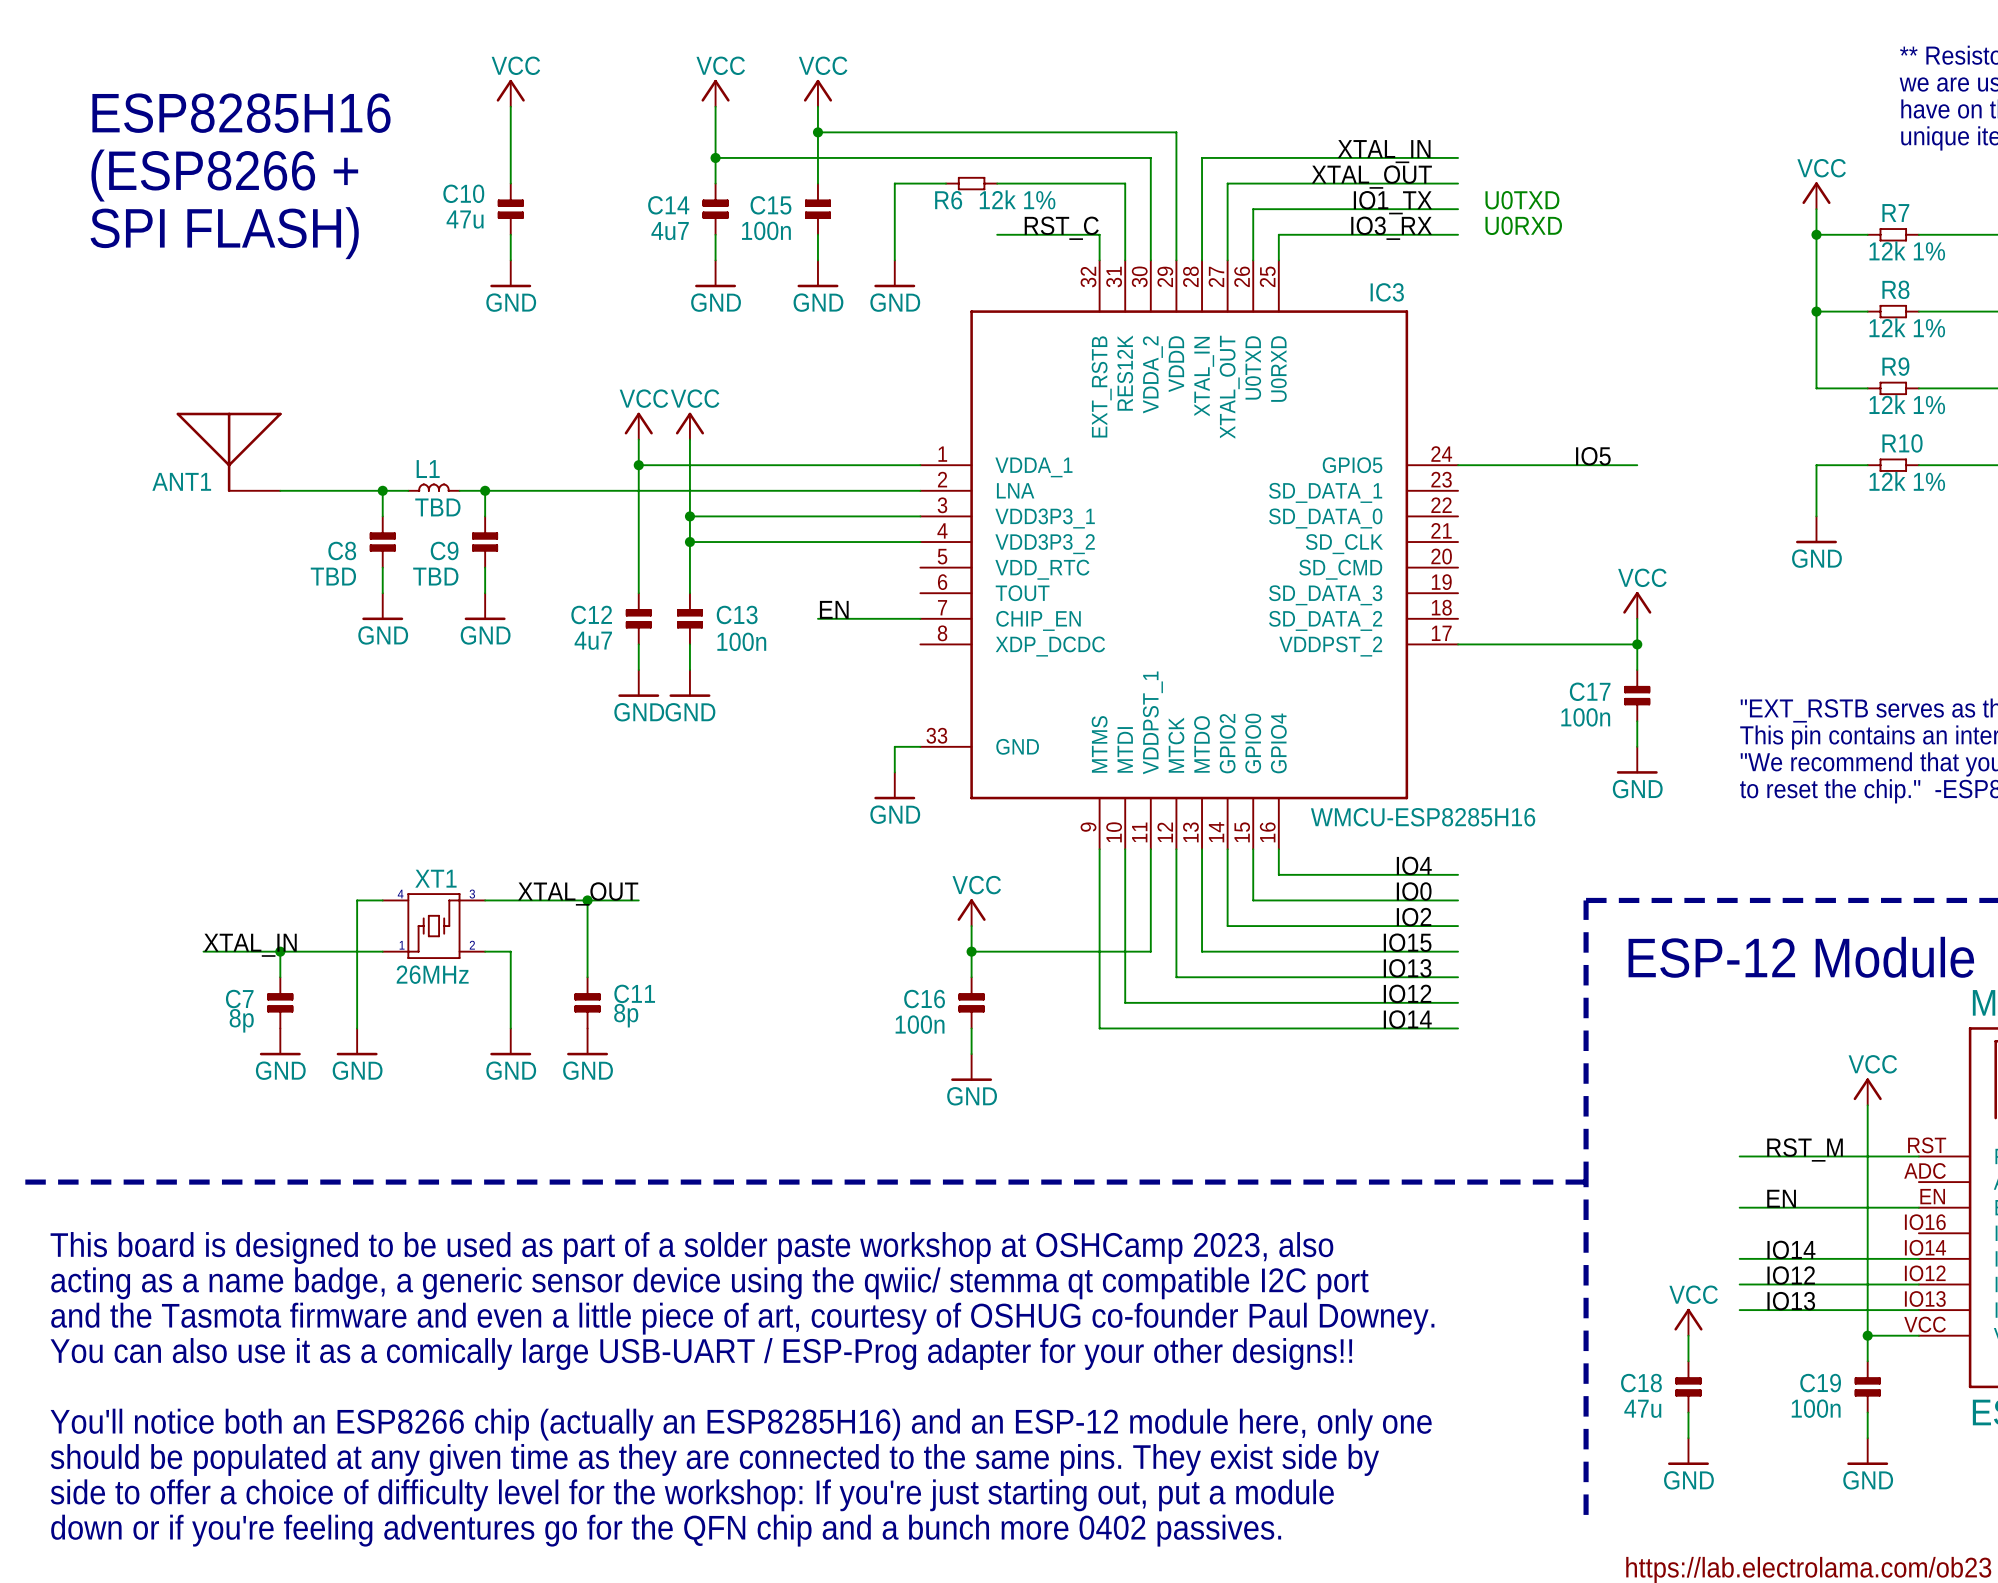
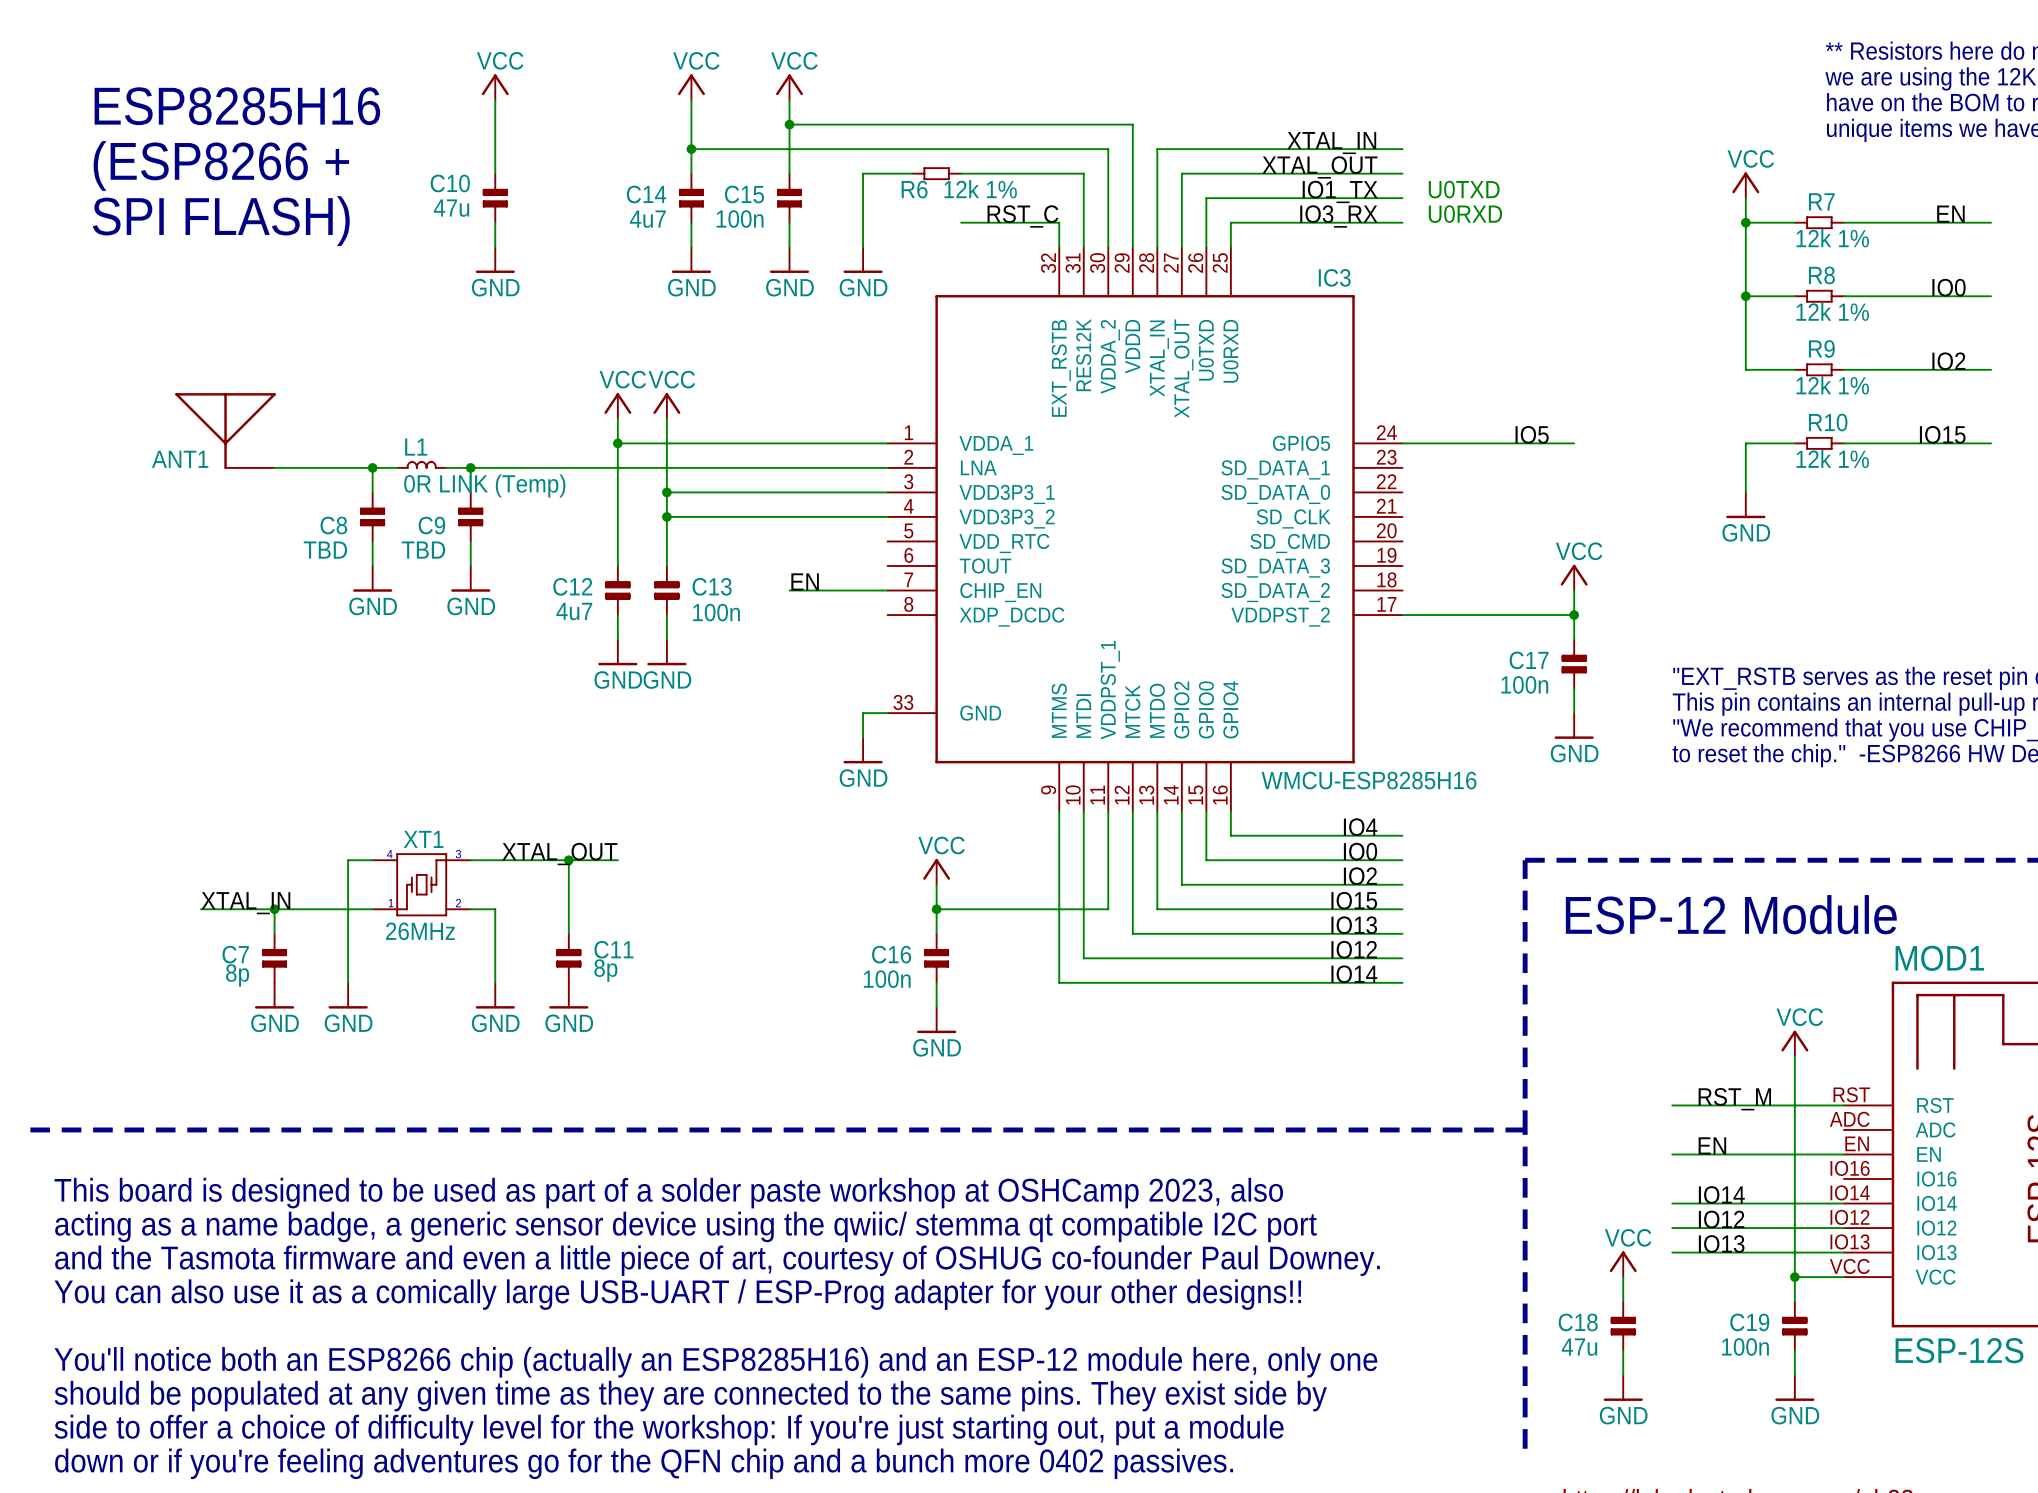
L1 value: TBD (437, 507) -> 0R LINK (Temp) (484, 485)

